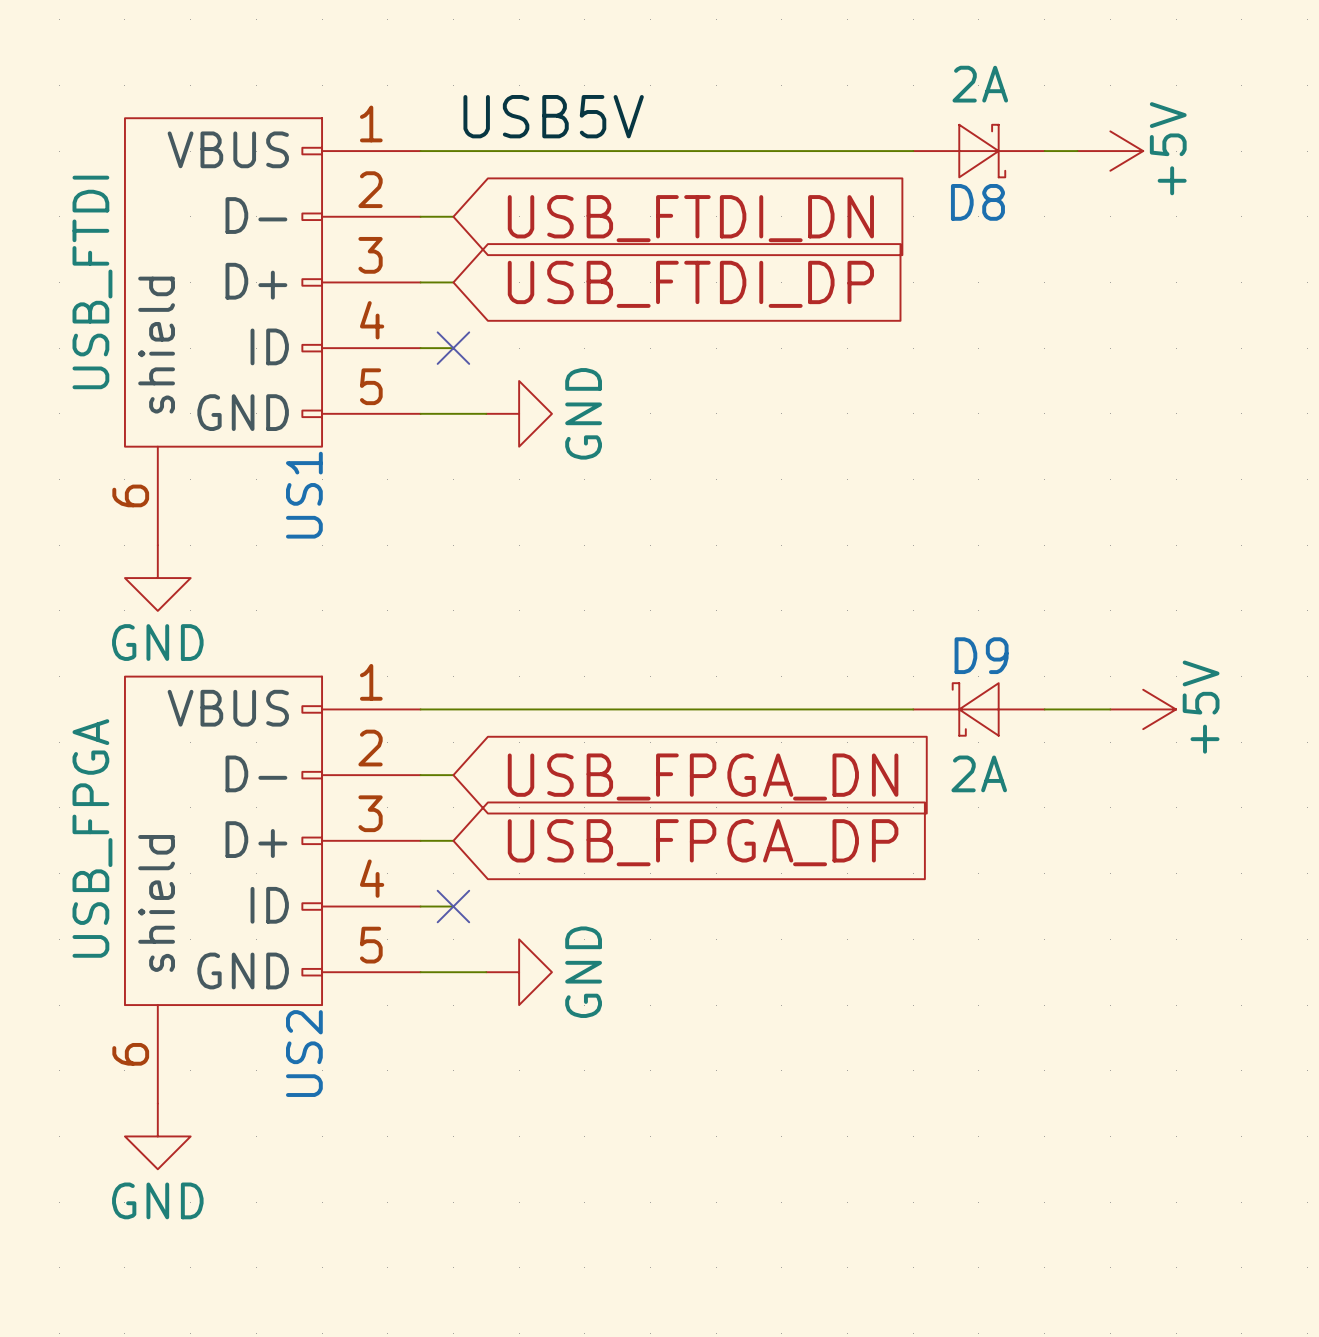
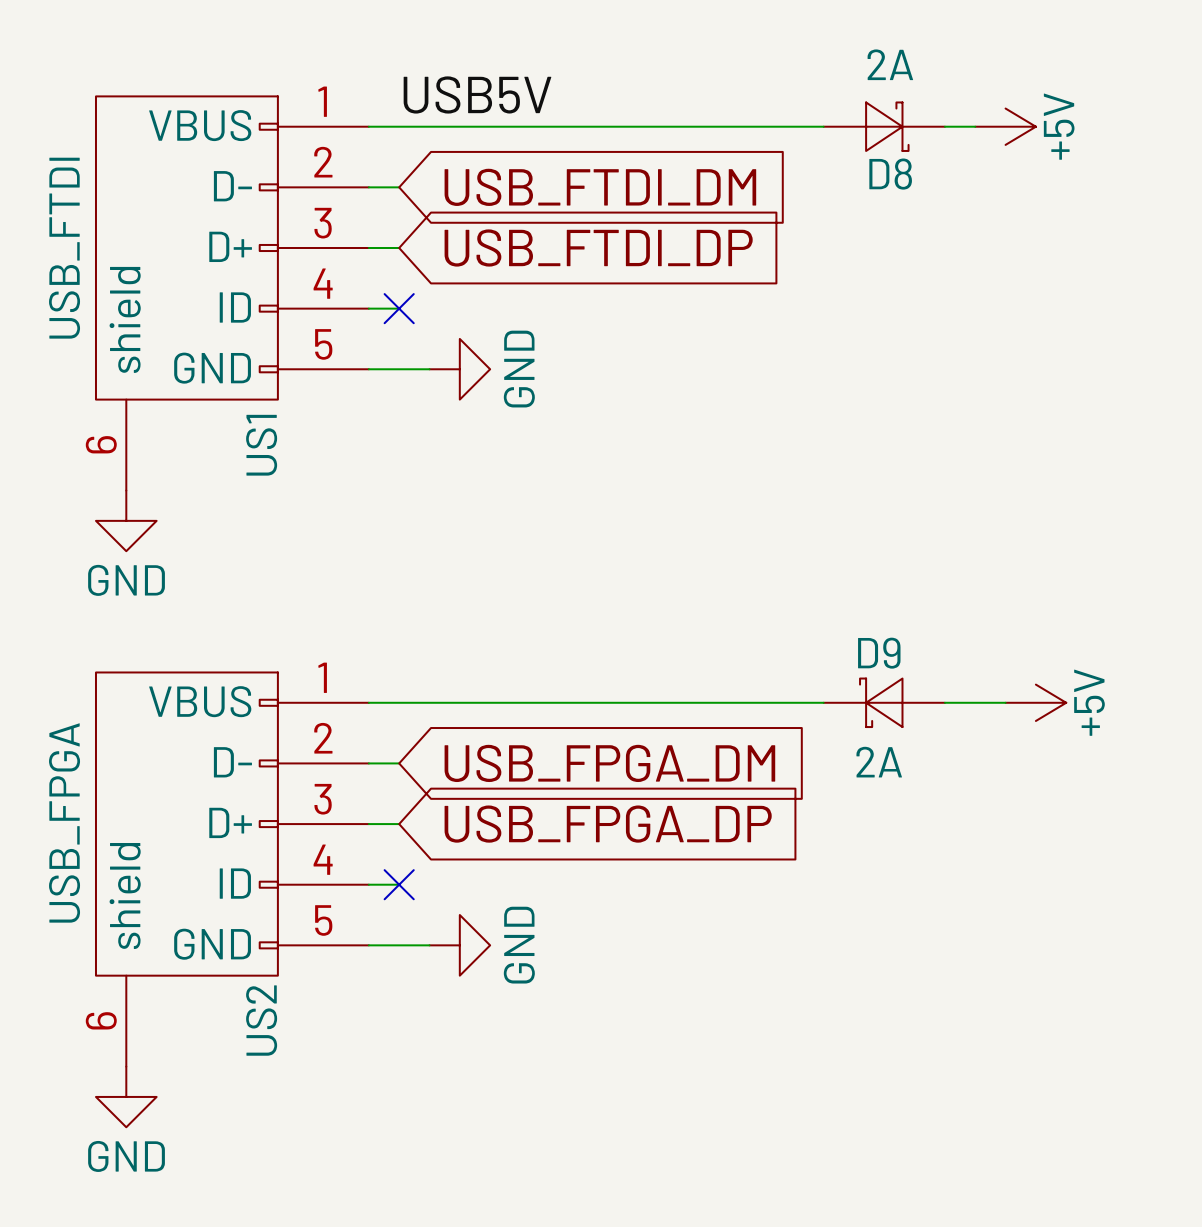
global label: USB_FTDI_DN (690, 218) -> USB_FTDI_DM (600, 187)
wire: (420, 709) (913, 709) -> none
D9 position: (978, 709) -> (884, 702)
wire: (1044, 709) (1110, 709) -> (944, 702) (1005, 702)
power symbol position: +5V (1143, 709) -> +5V (1035, 702)
wire: none -> (399, 702) (823, 702)
global label: USB_FPGA_DN (703, 777) -> none
global label: USB_FPGA_DP (703, 842) -> USB_FPGA_DM (609, 763)
US2 position: (272, 890) -> (232, 869)
no-connect mark position: (453, 906) -> (399, 884)
global label: none -> USB_FPGA_DP (608, 824)
wire: (453, 972) (486, 972) -> none
power symbol position: GND (519, 972) -> GND (459, 945)
wire: none -> (368, 945) (429, 945)
power symbol position: GND (157, 1136) -> GND (126, 1096)

